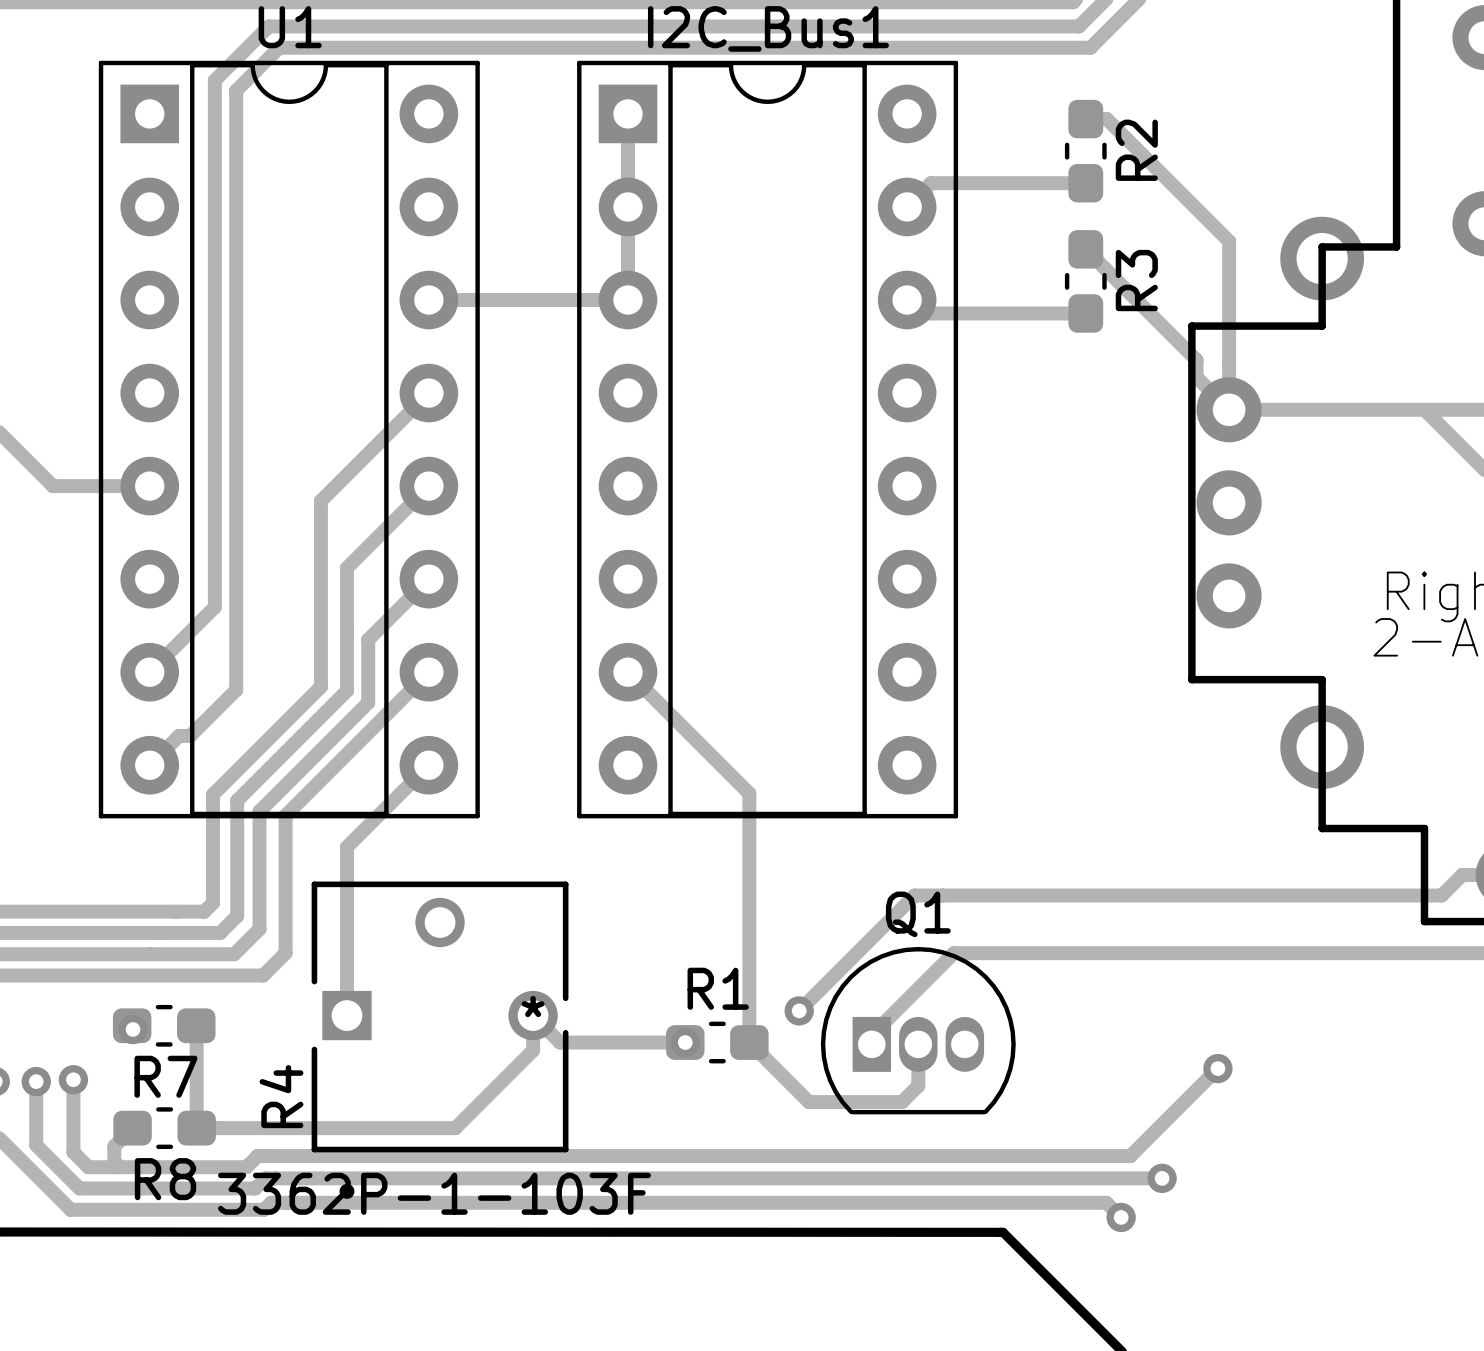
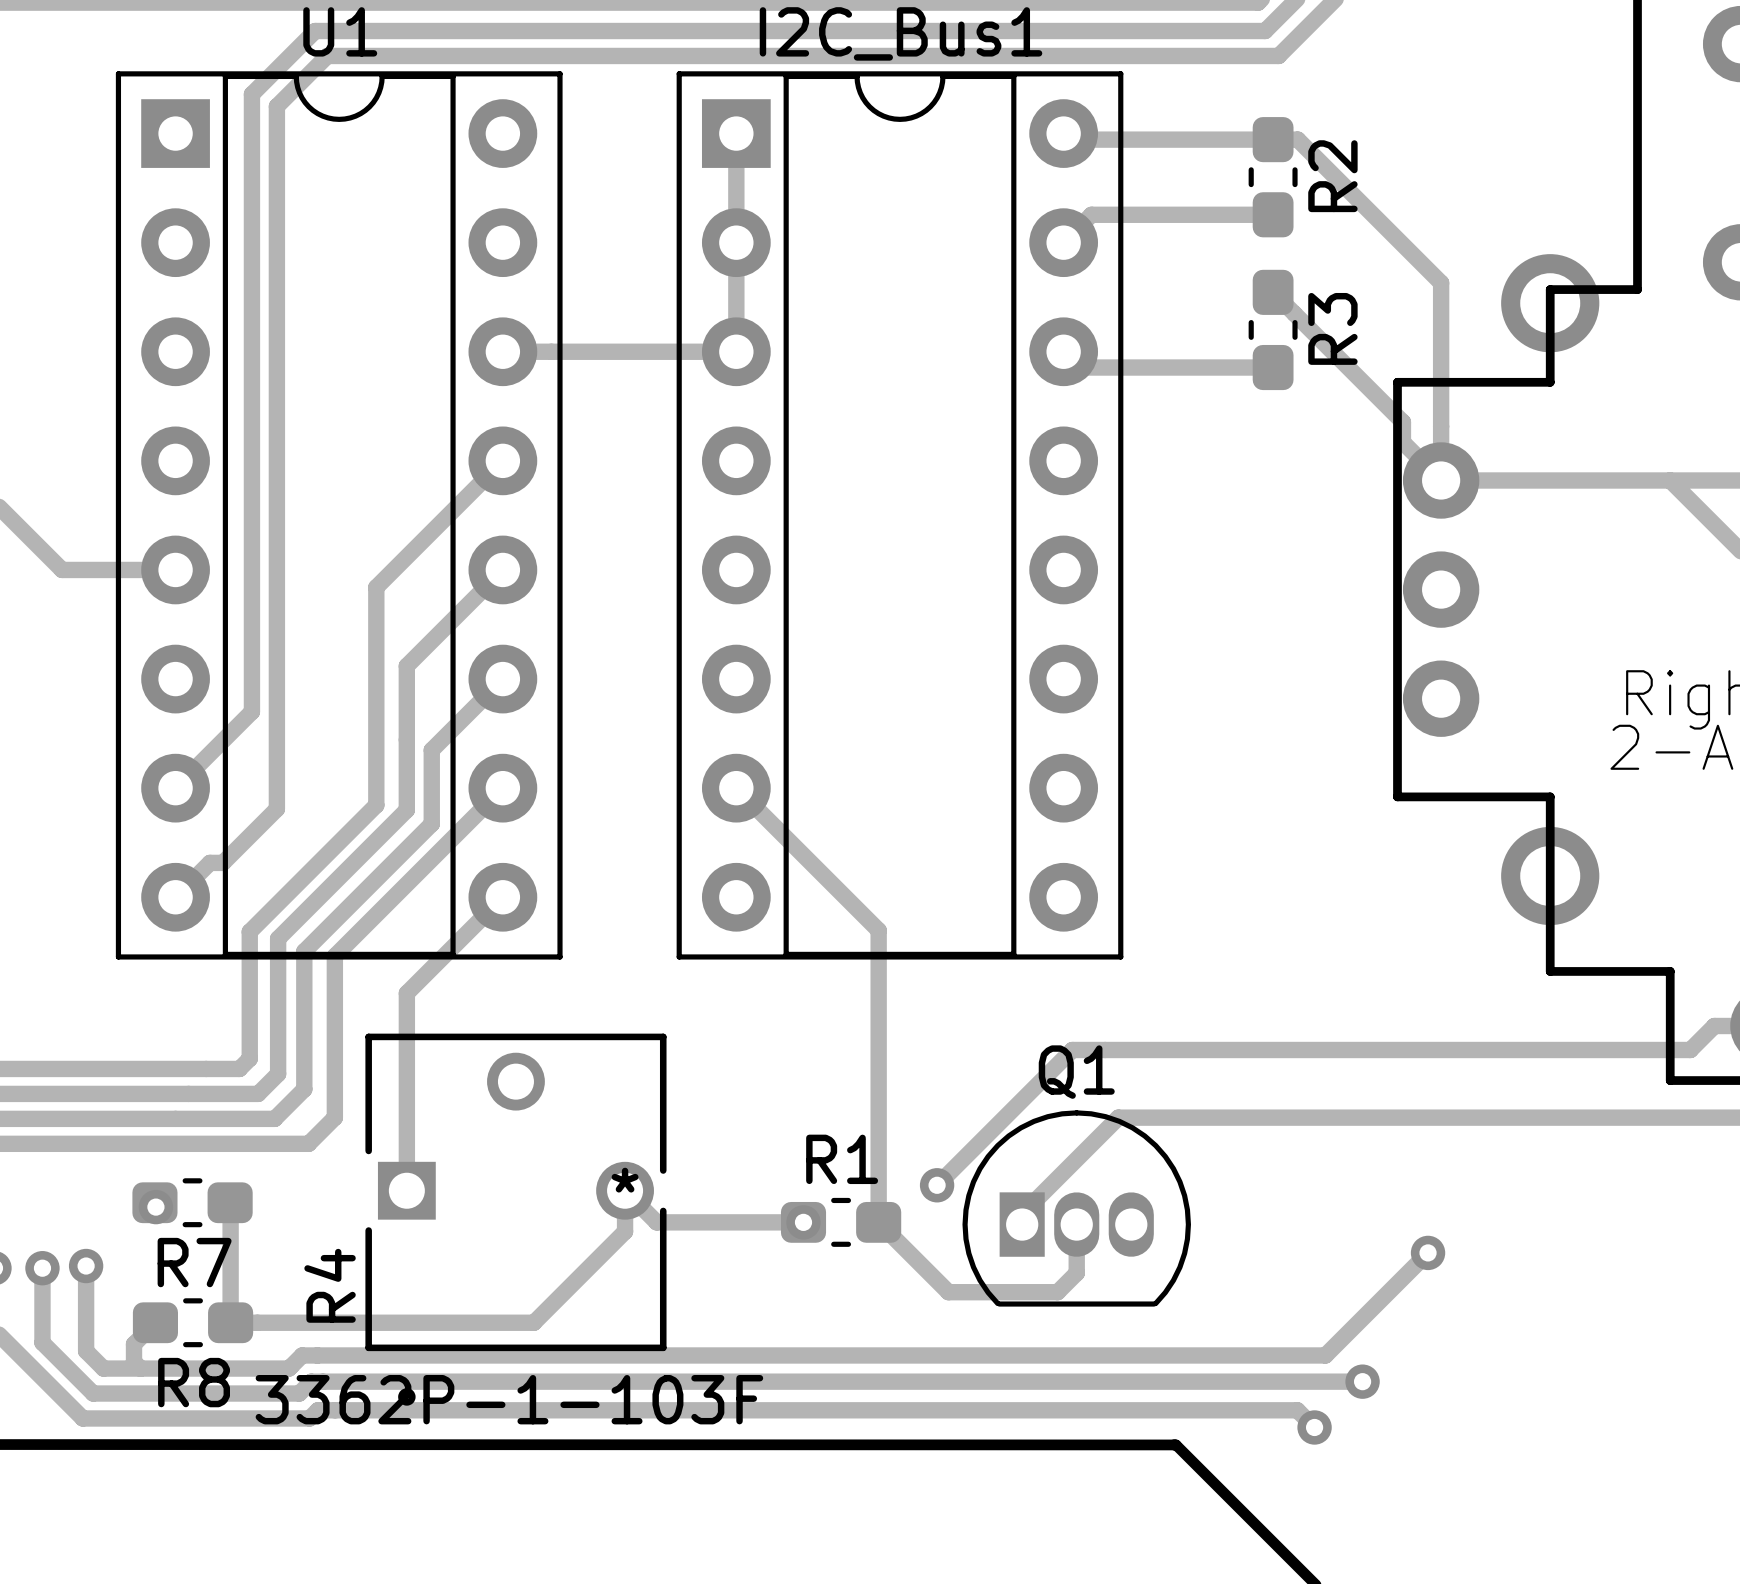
track: none -> (1063, 133) (1069, 139) (1273, 139)

